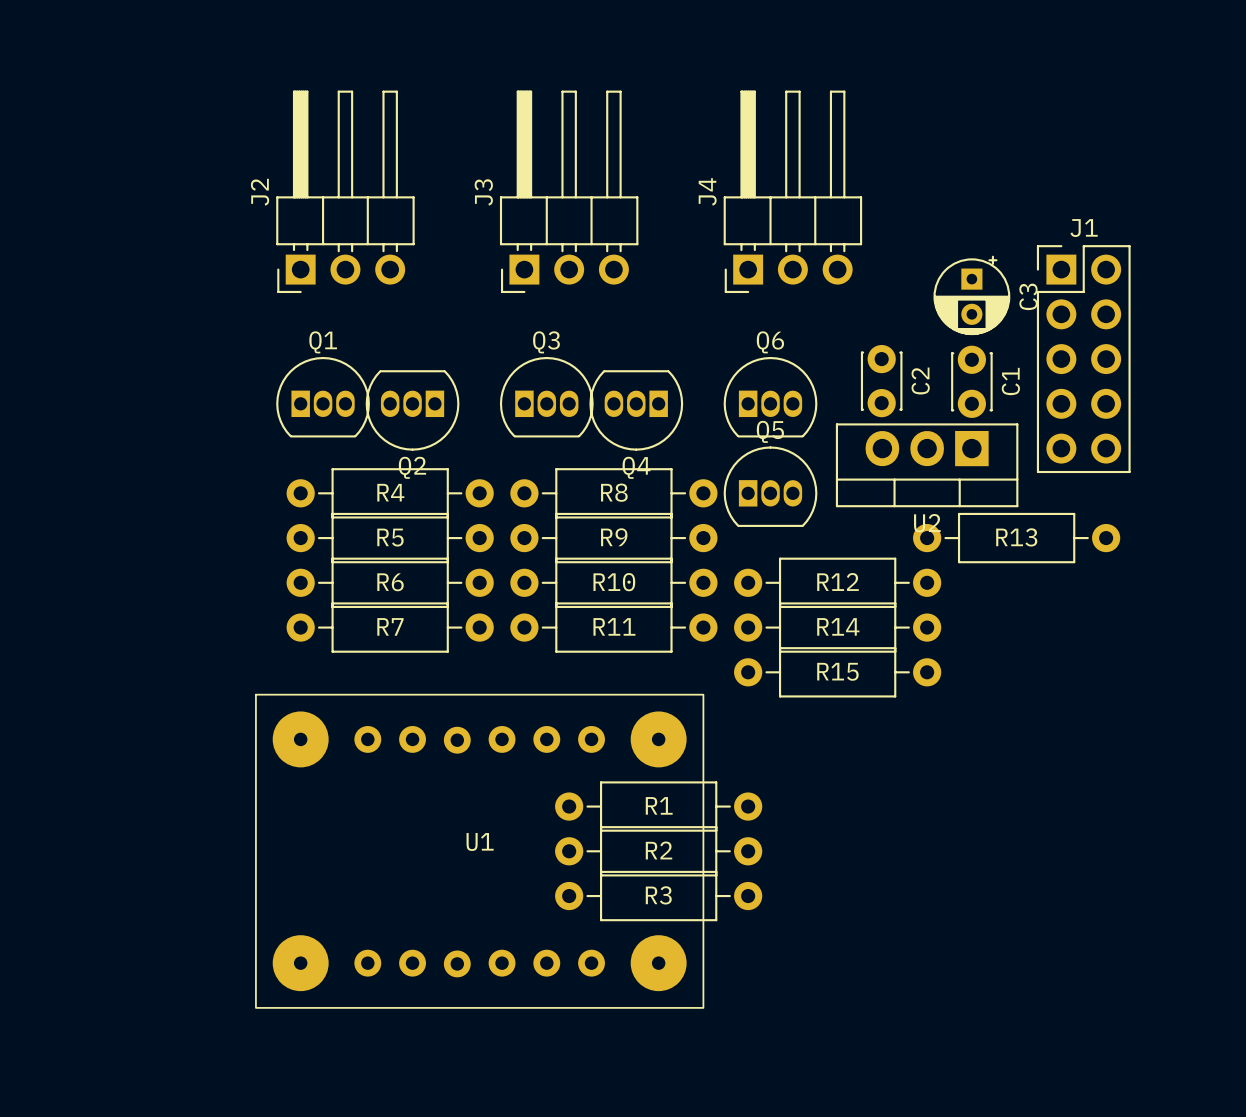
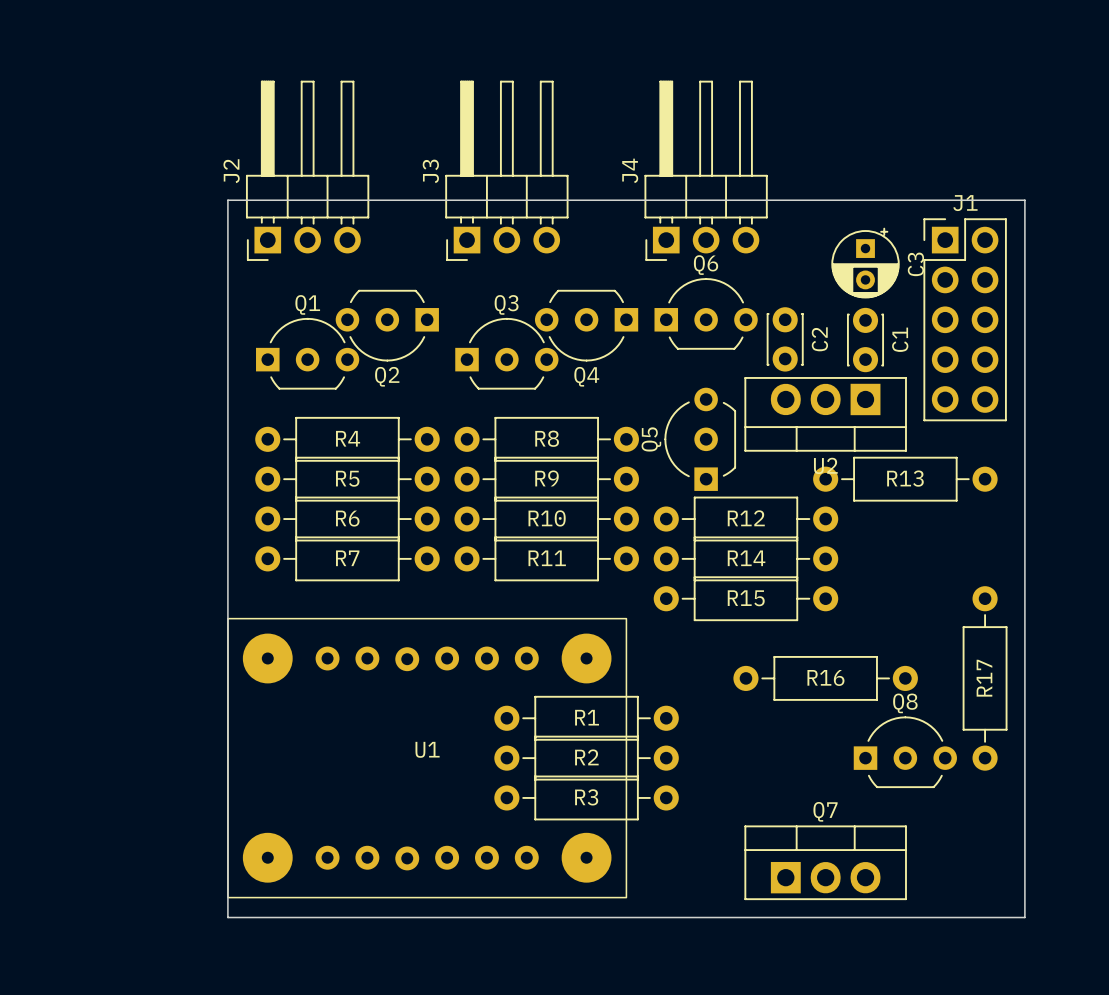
board edge: none -> (227, 200) (1024, 200) (1024, 917) (227, 917) (227, 200)
Q1 footprint: [276, 356, 370, 438] -> [256, 317, 360, 390]
Q3 footprint: [499, 356, 594, 438] -> [455, 317, 559, 390]
Q6 footprint: [723, 356, 818, 438] -> [654, 278, 758, 350]
Q2 footprint: [365, 370, 460, 451] -> [335, 289, 439, 362]
Q4 footprint: [589, 370, 684, 451] -> [534, 289, 639, 362]
Q5 name position: Q5 (770, 431) -> Q5 (651, 439)
Q5 footprint: [723, 446, 818, 527] -> [664, 387, 737, 491]
R16: none -> (825, 678)
R17: none -> (985, 678)
Q8: none -> (905, 752)
Q7: none -> (825, 862)

